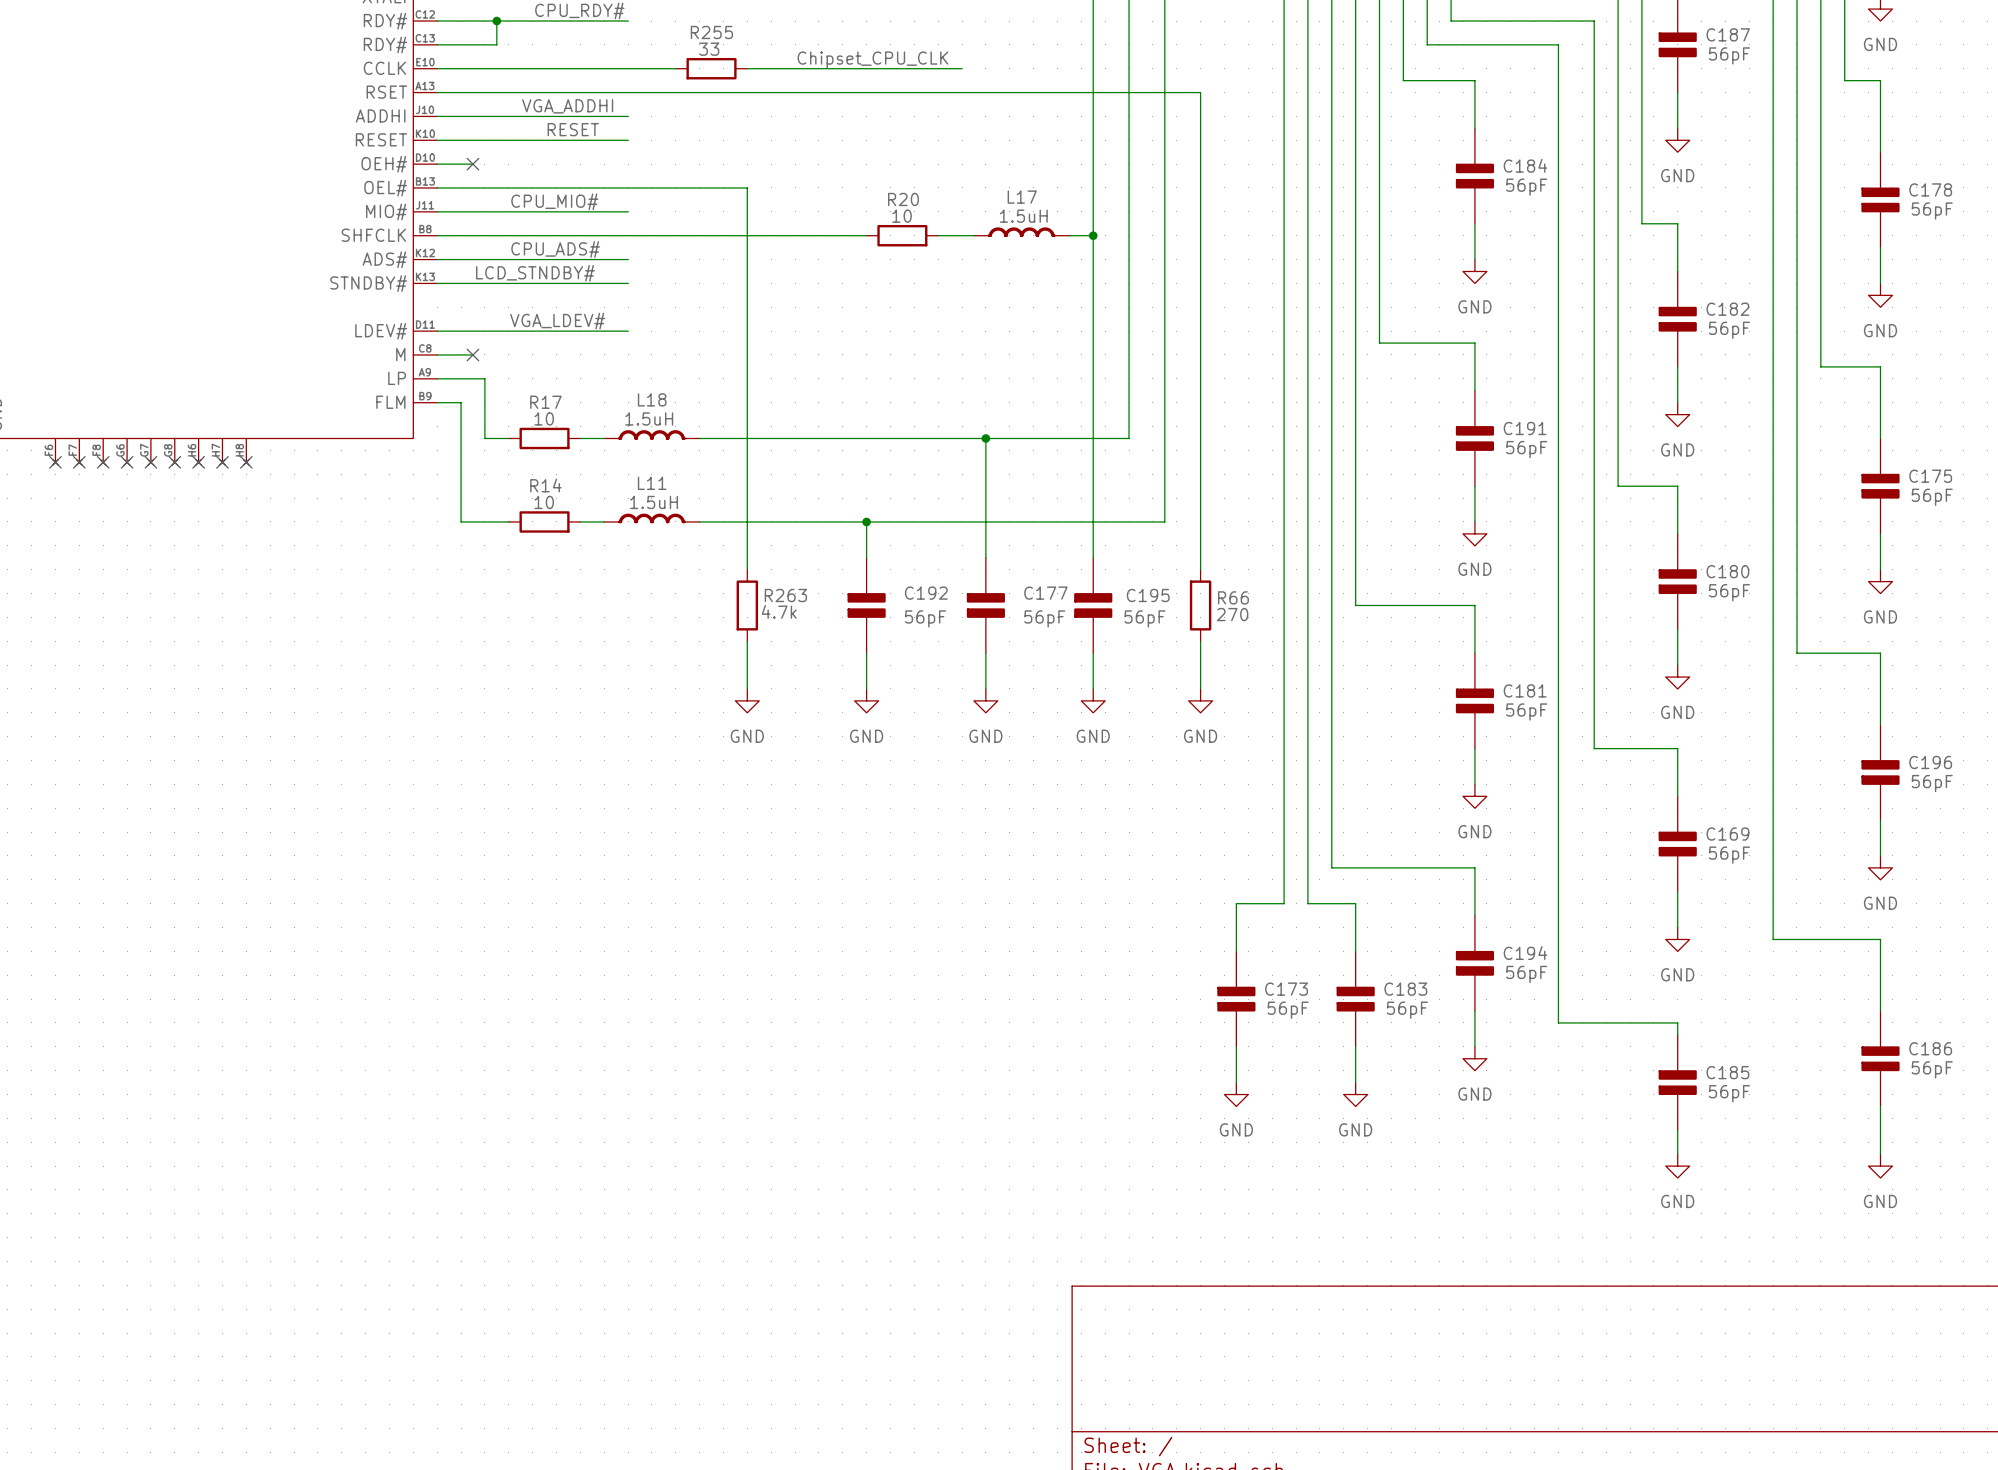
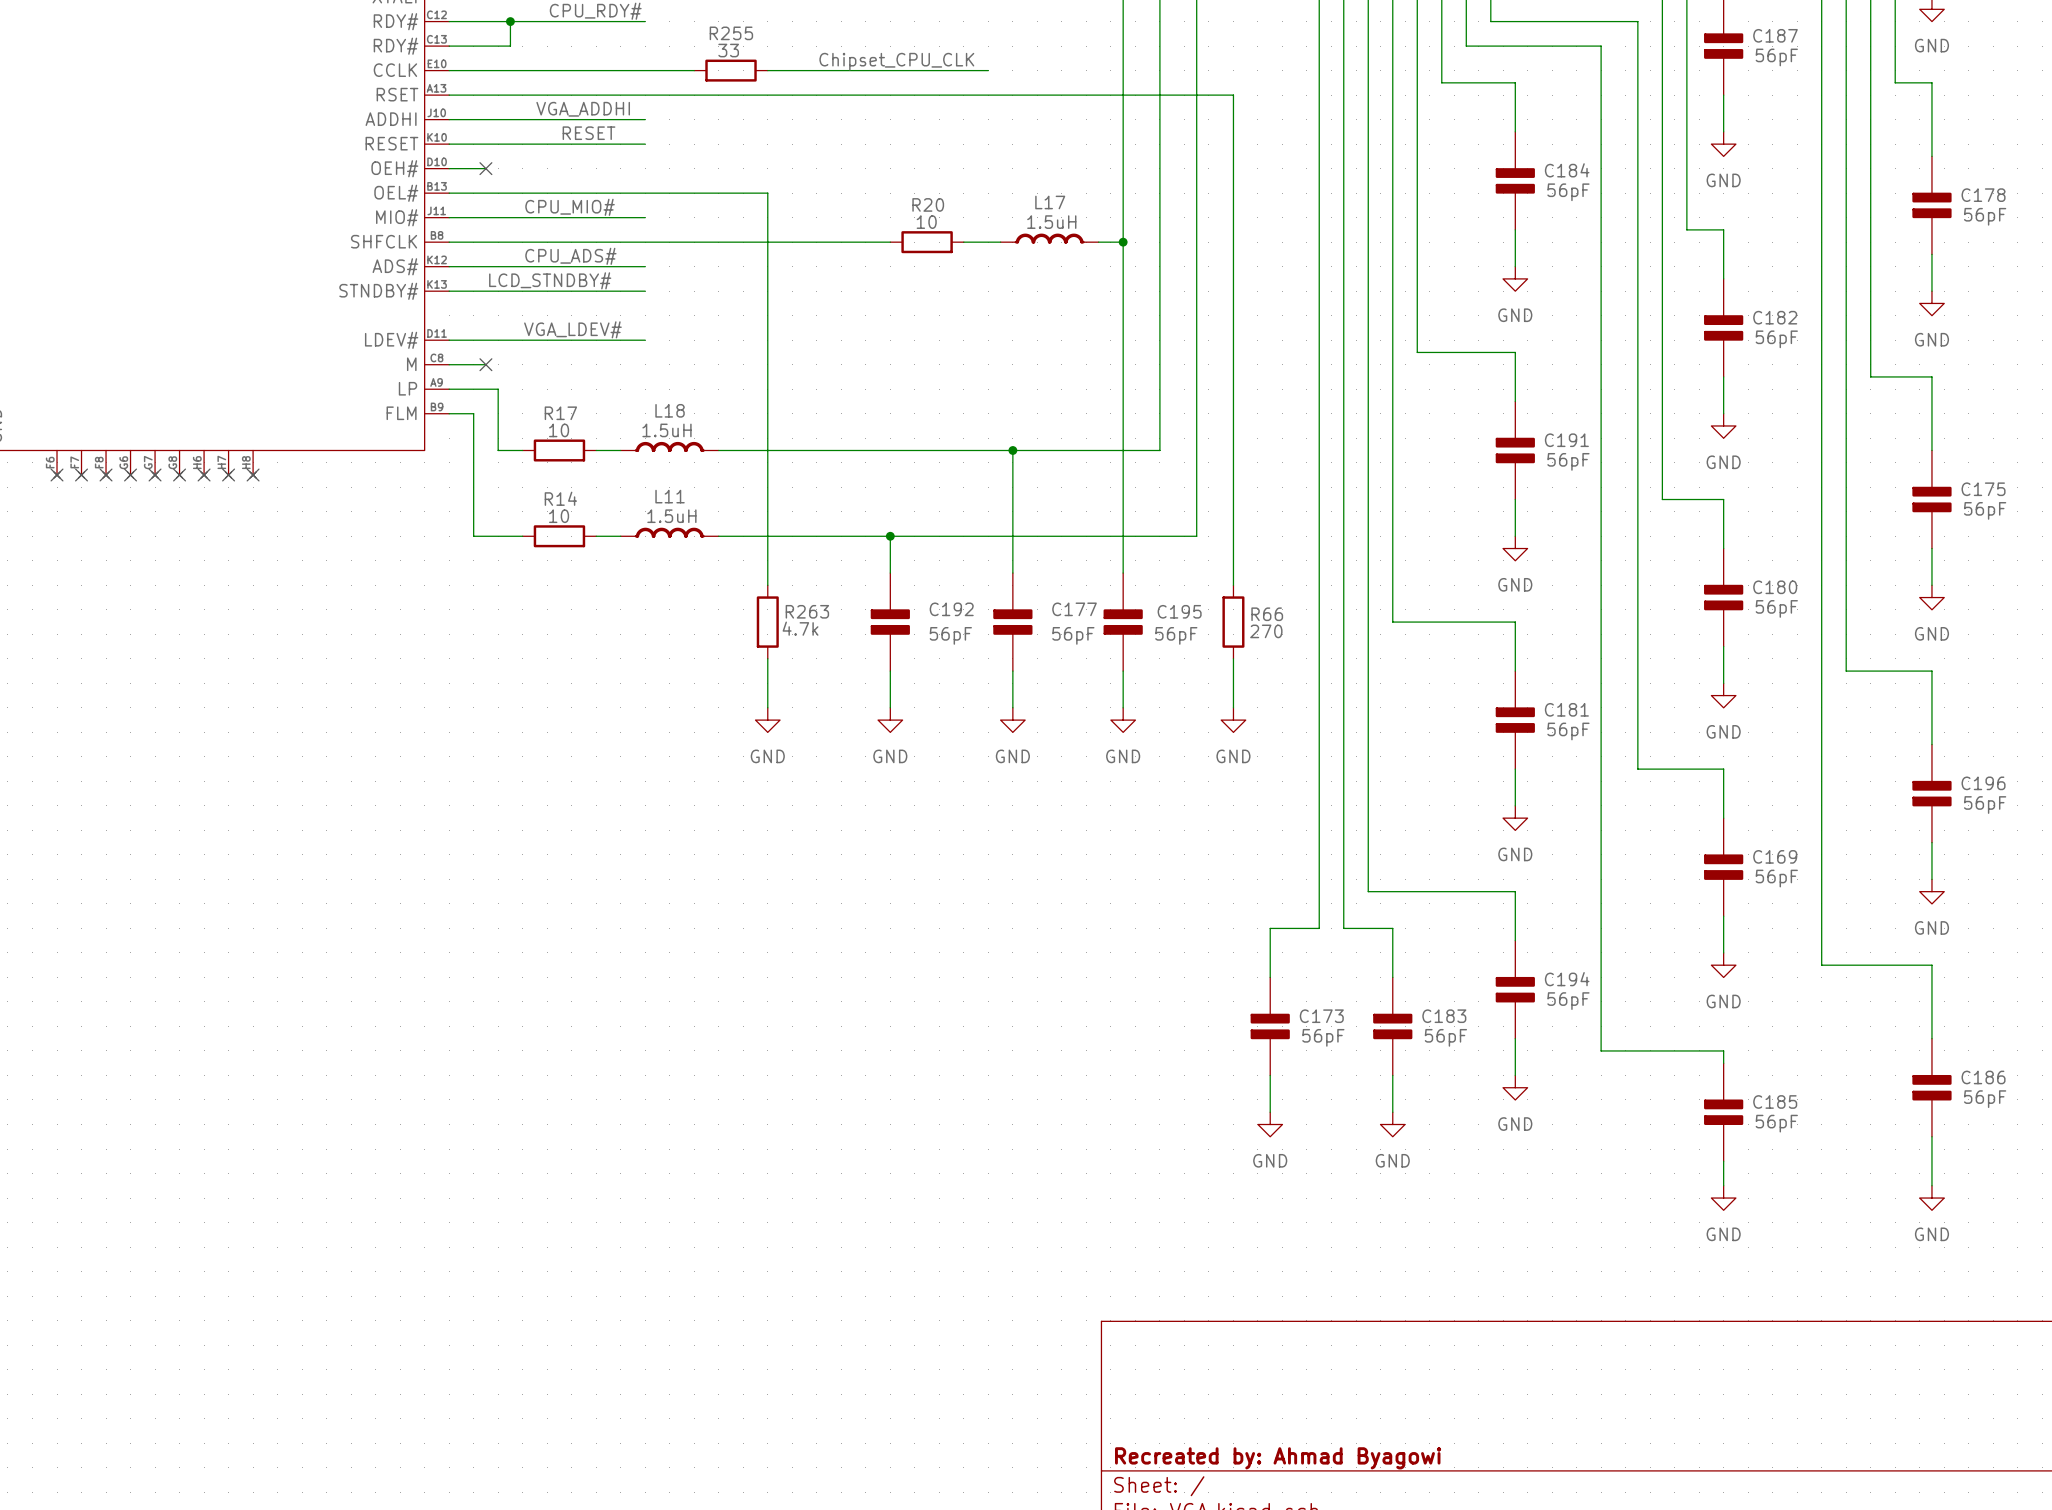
title block: none -> Recreated by: Ahmad Byagowi (1278, 1458)

